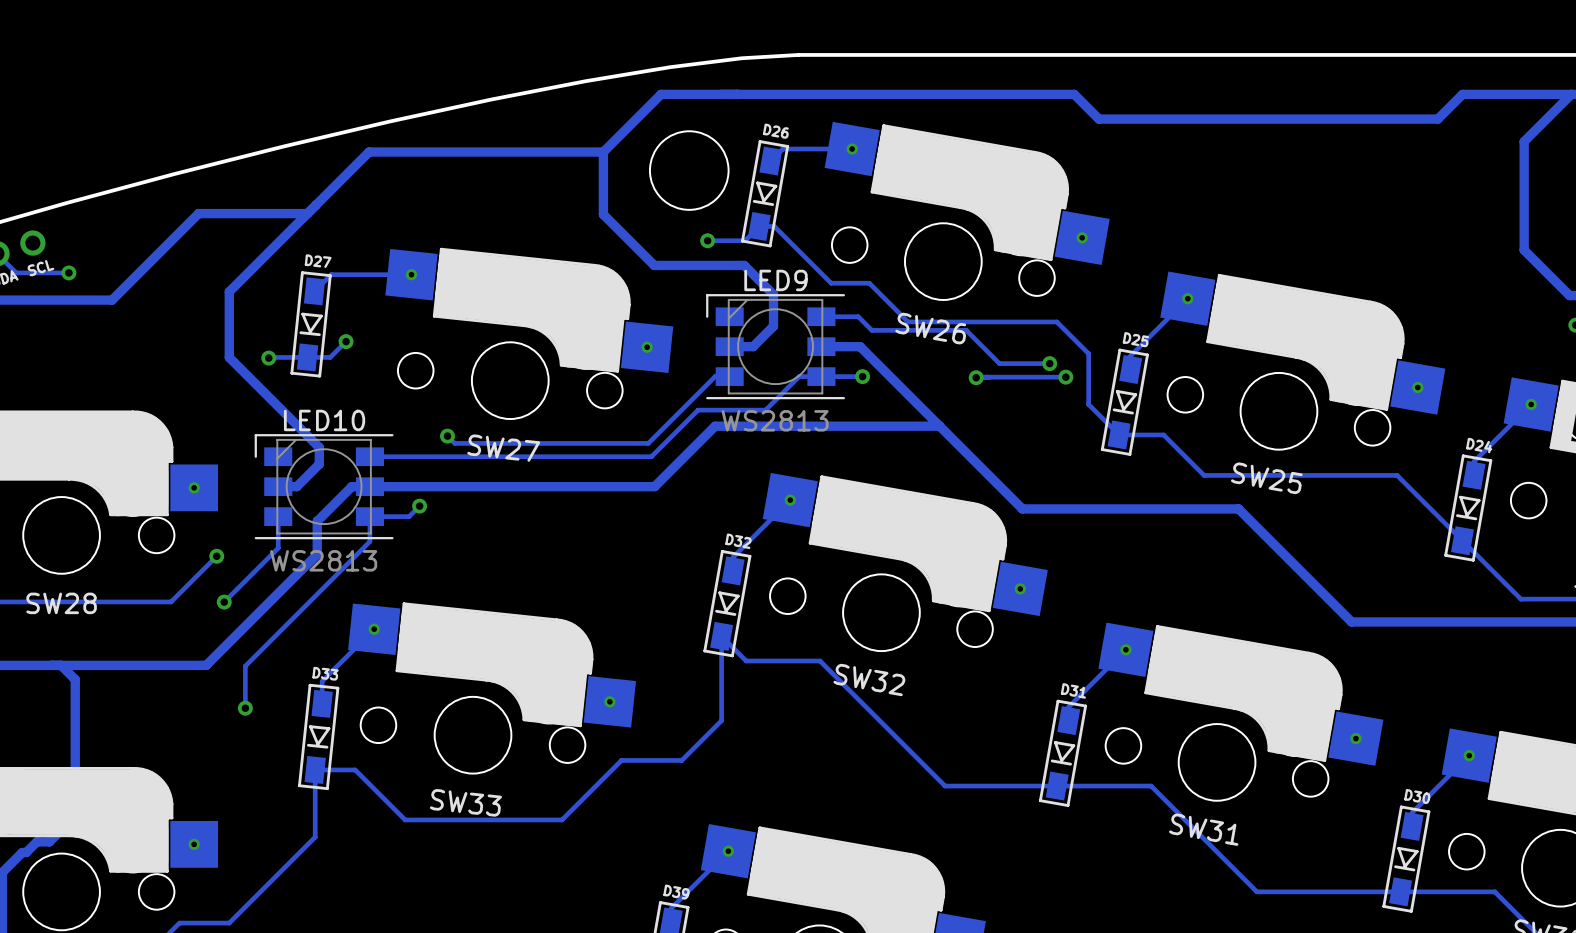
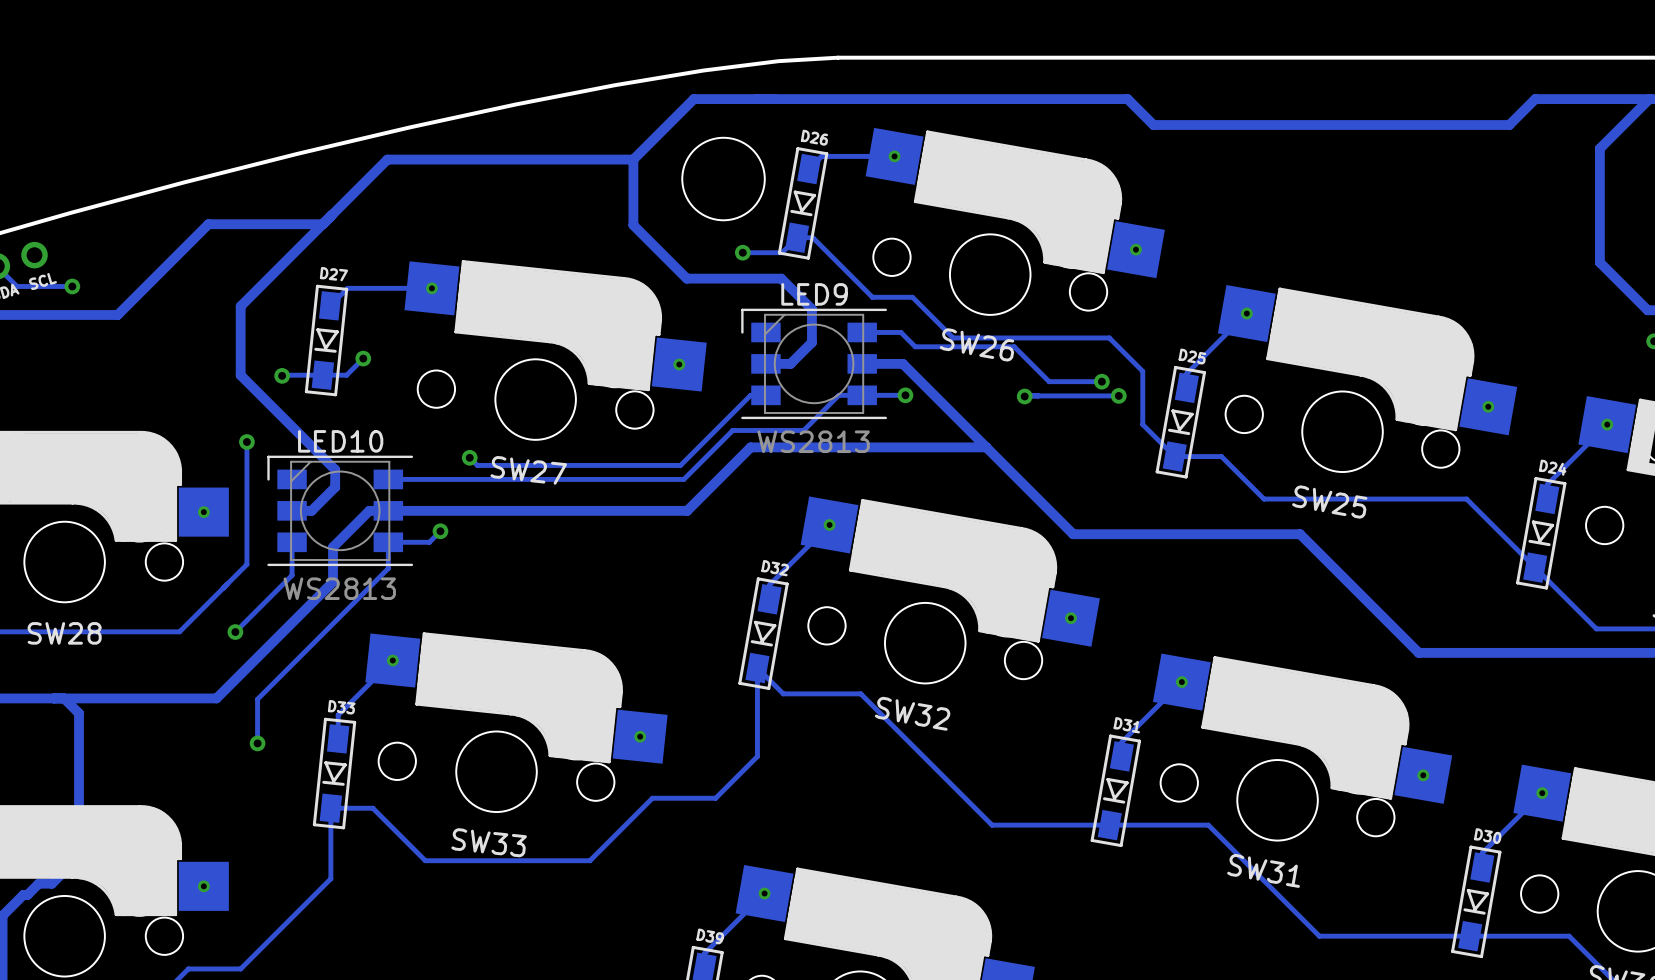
track: none -> (246, 442) (246, 564) (227, 583)
via: none -> (246, 442)
via: (216, 556) -> none

